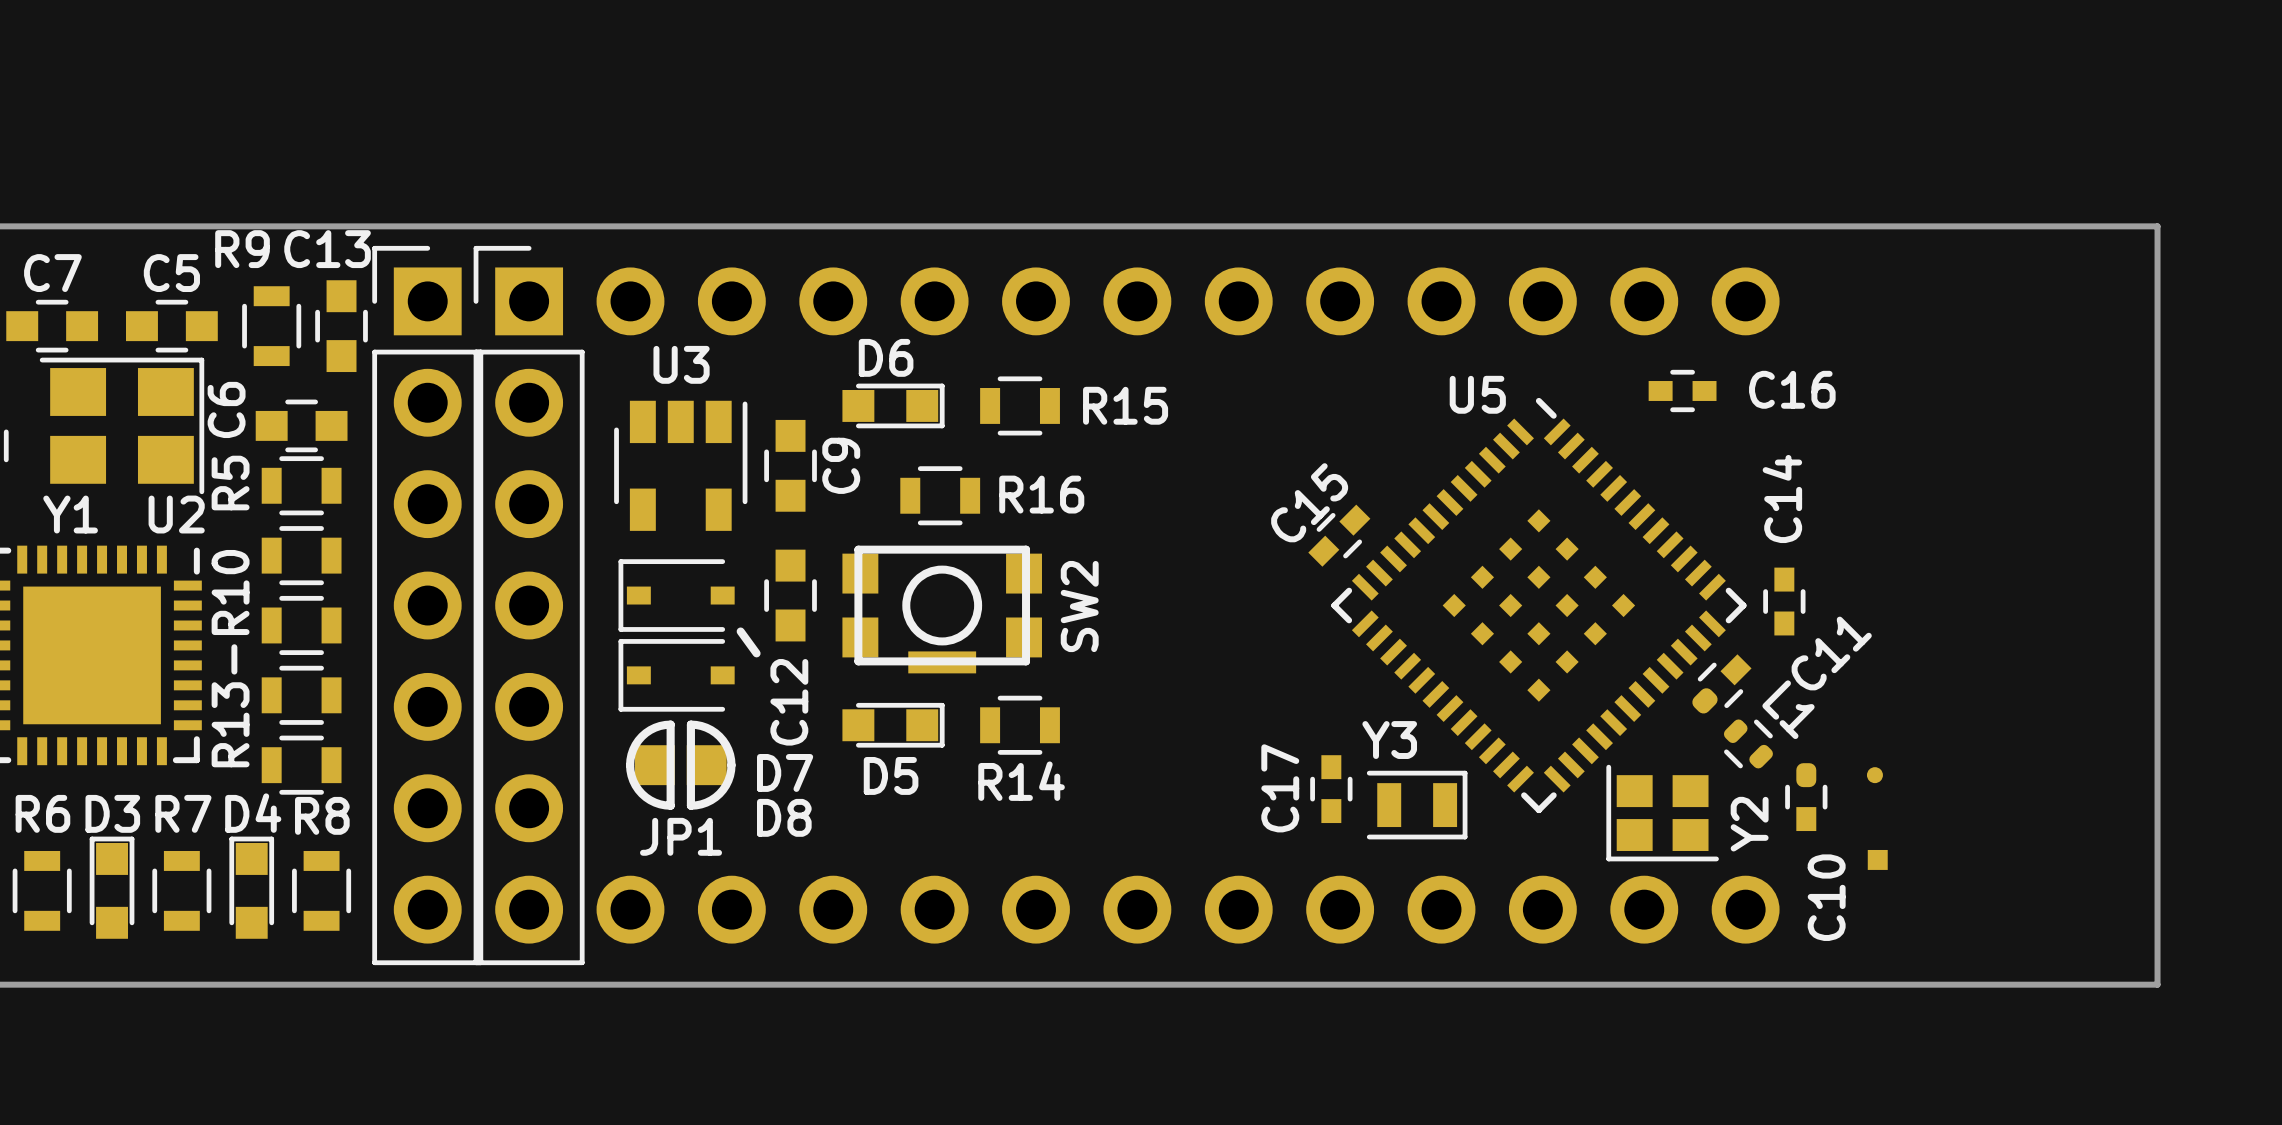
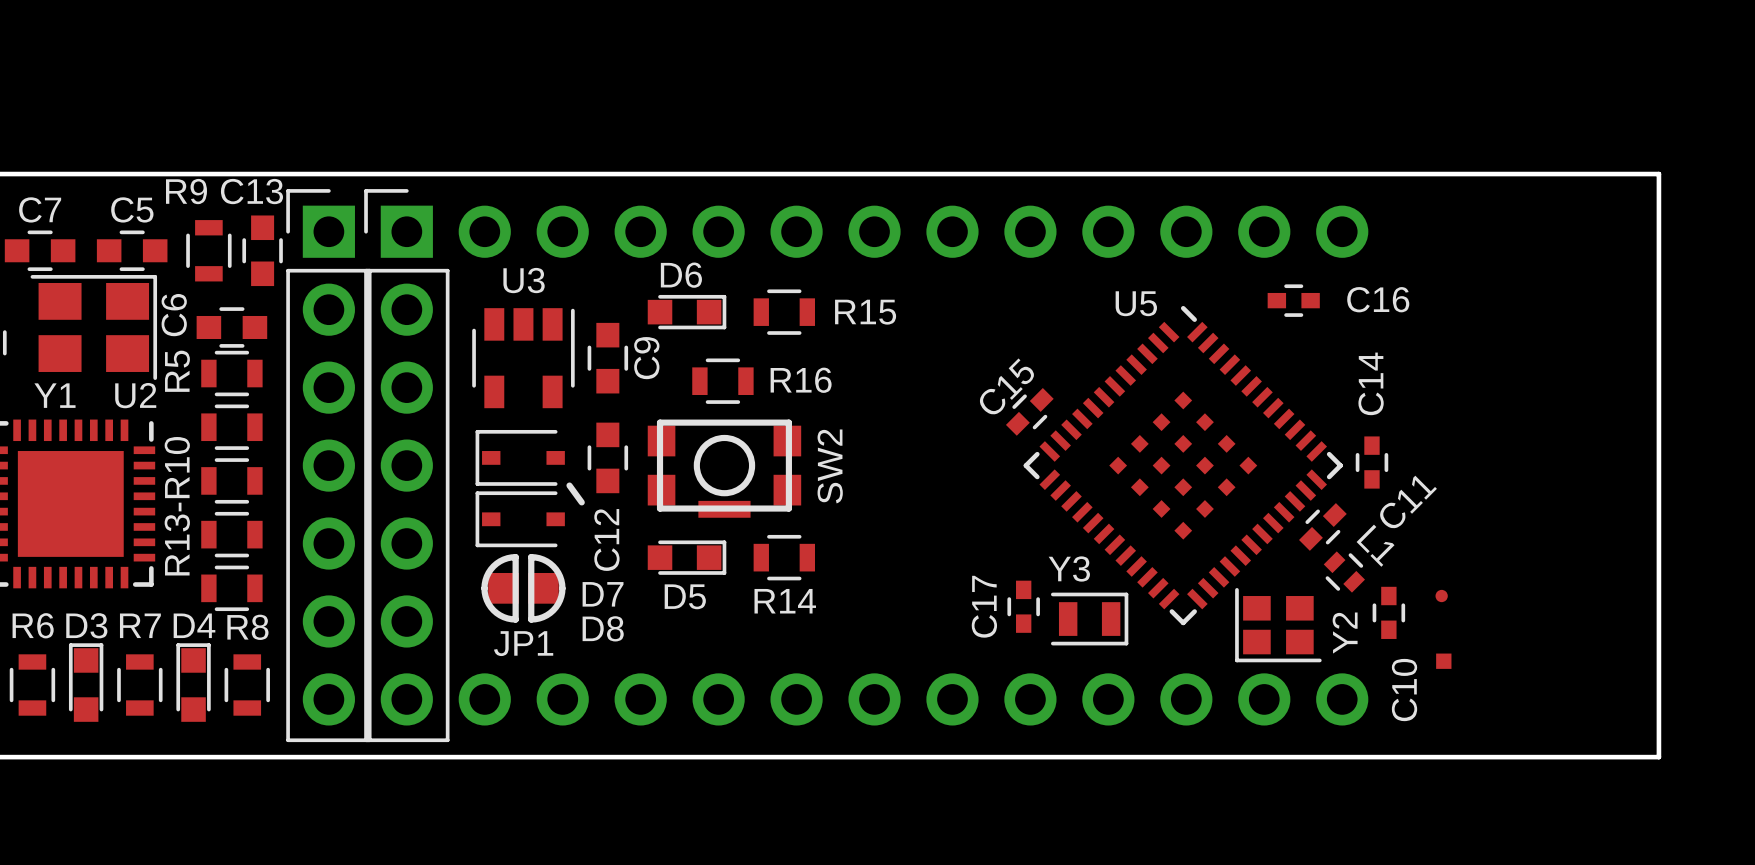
C11 footprint: [1692, 654, 1752, 714] -> [1299, 503, 1347, 551]
L1 footprint: [1723, 719, 1773, 769] -> [1323, 551, 1365, 593]
C10 footprint: [1785, 763, 1828, 832] -> [1372, 586, 1406, 639]

